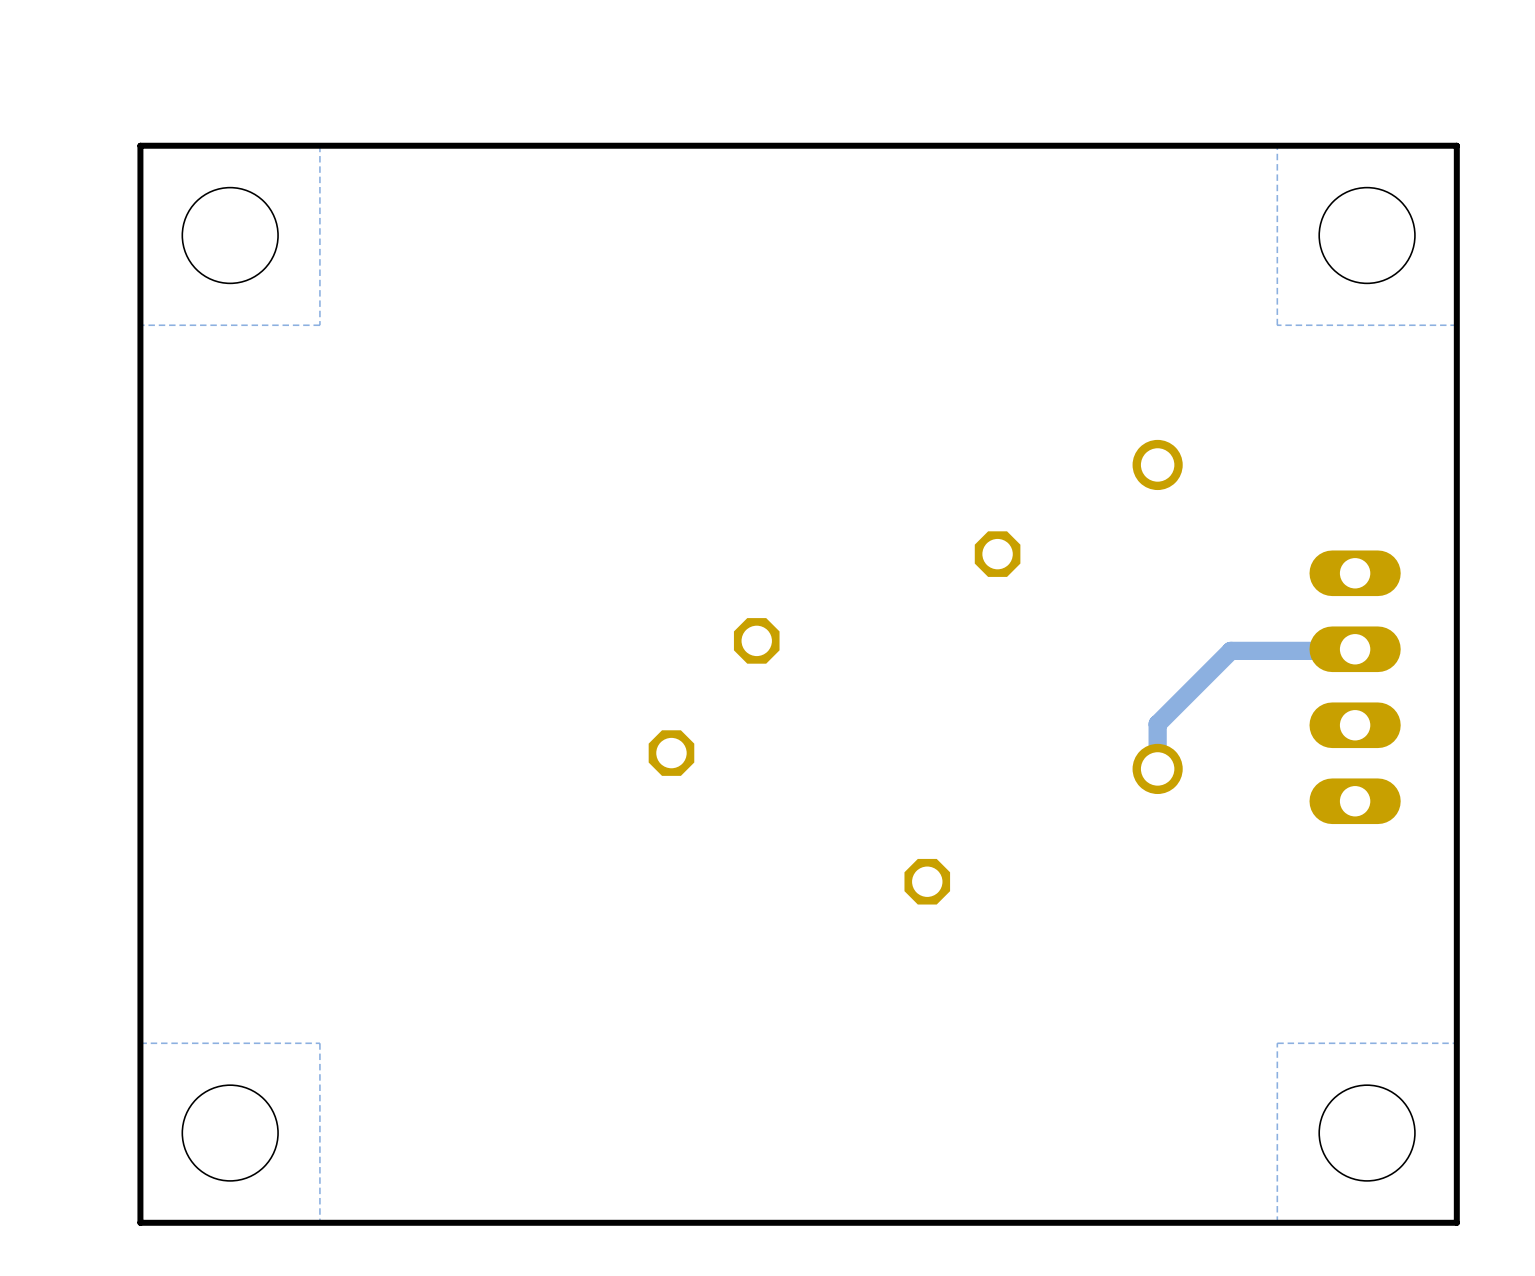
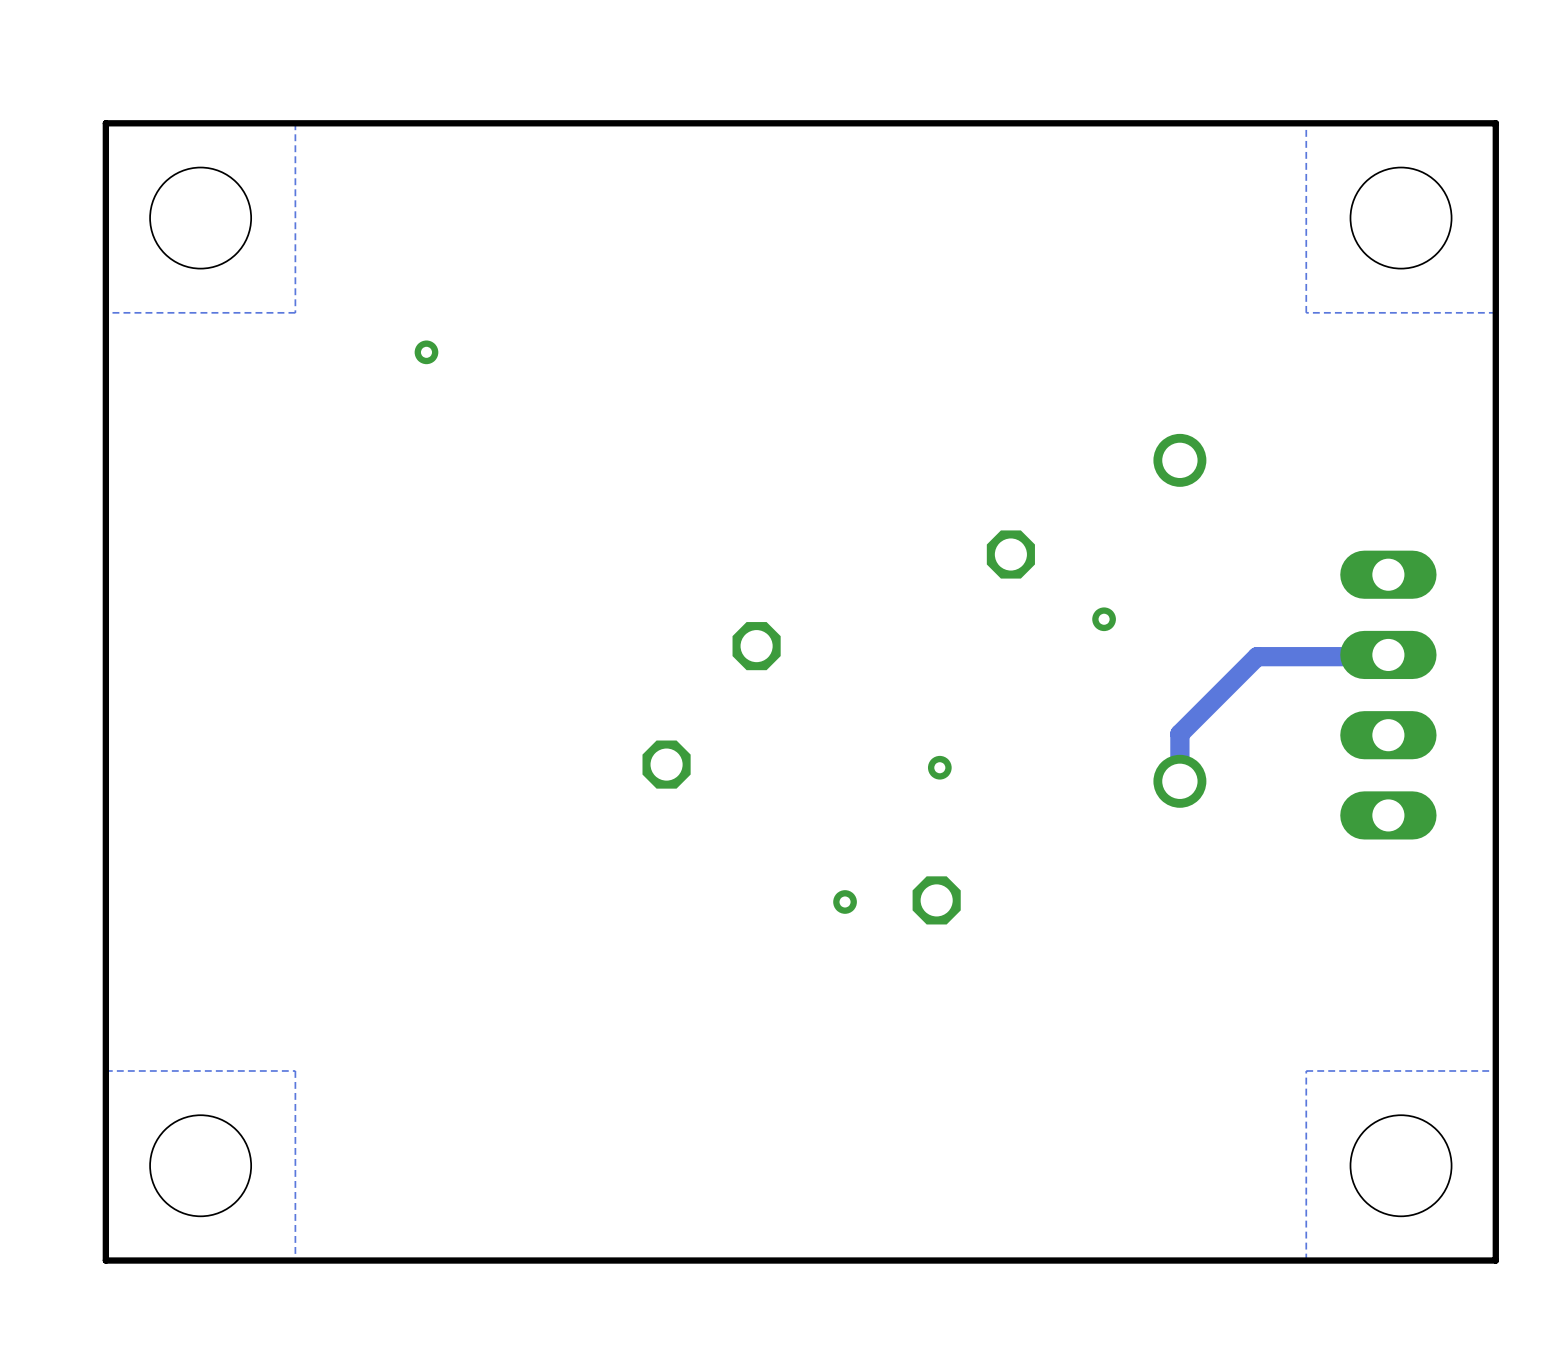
via: none -> (426, 352)
via: none -> (1104, 619)
via: none -> (939, 767)
via: none -> (845, 901)

